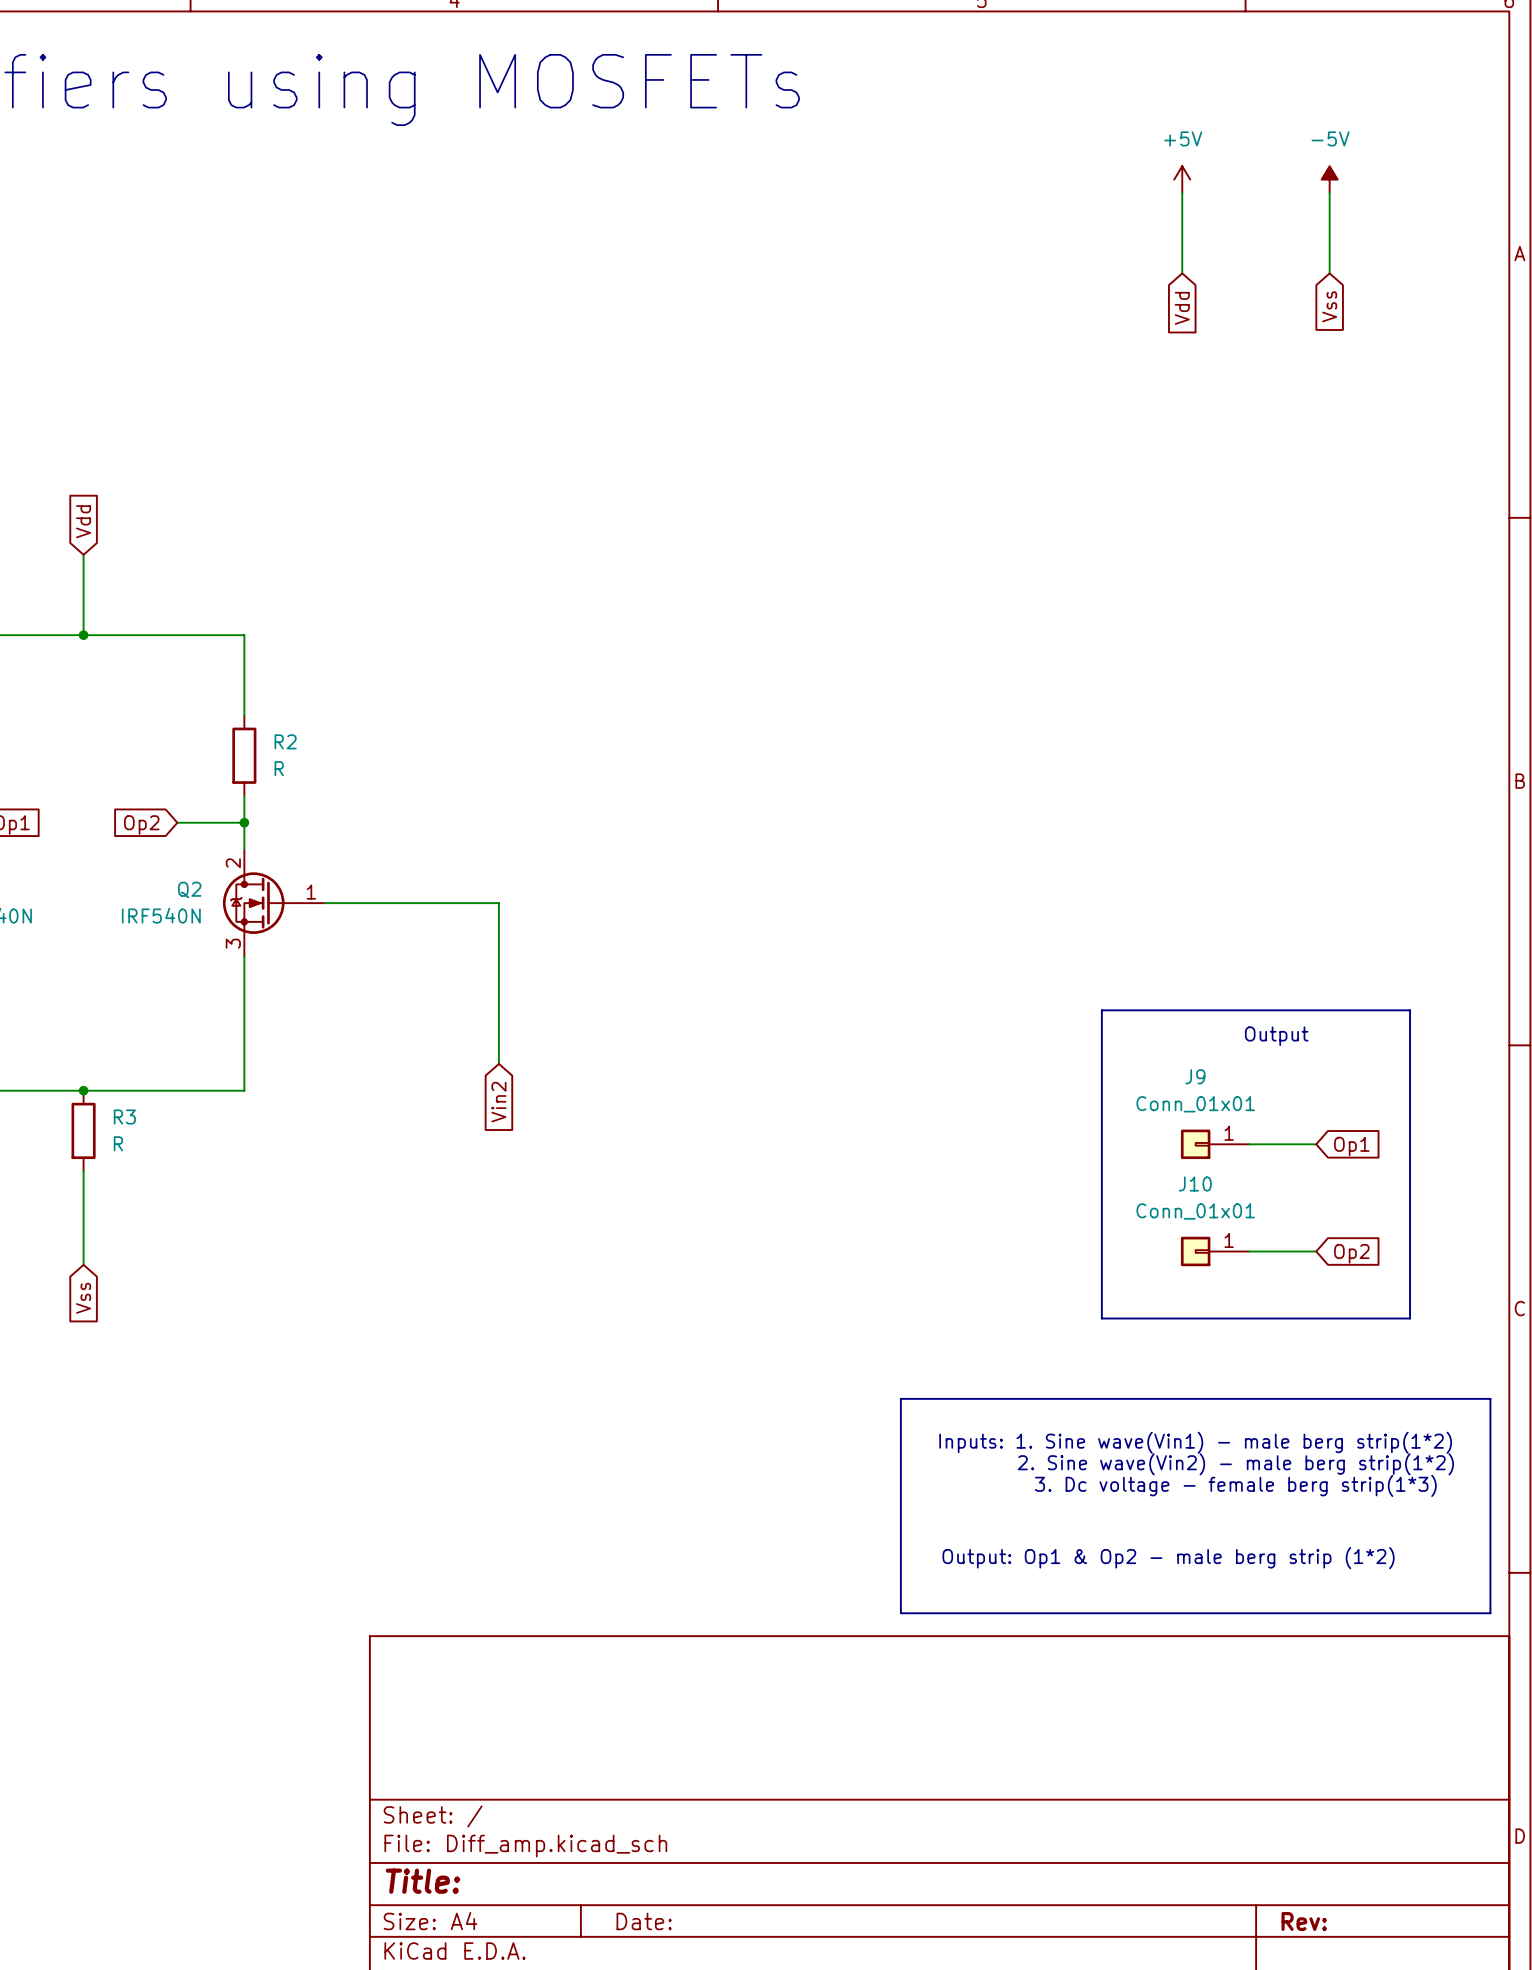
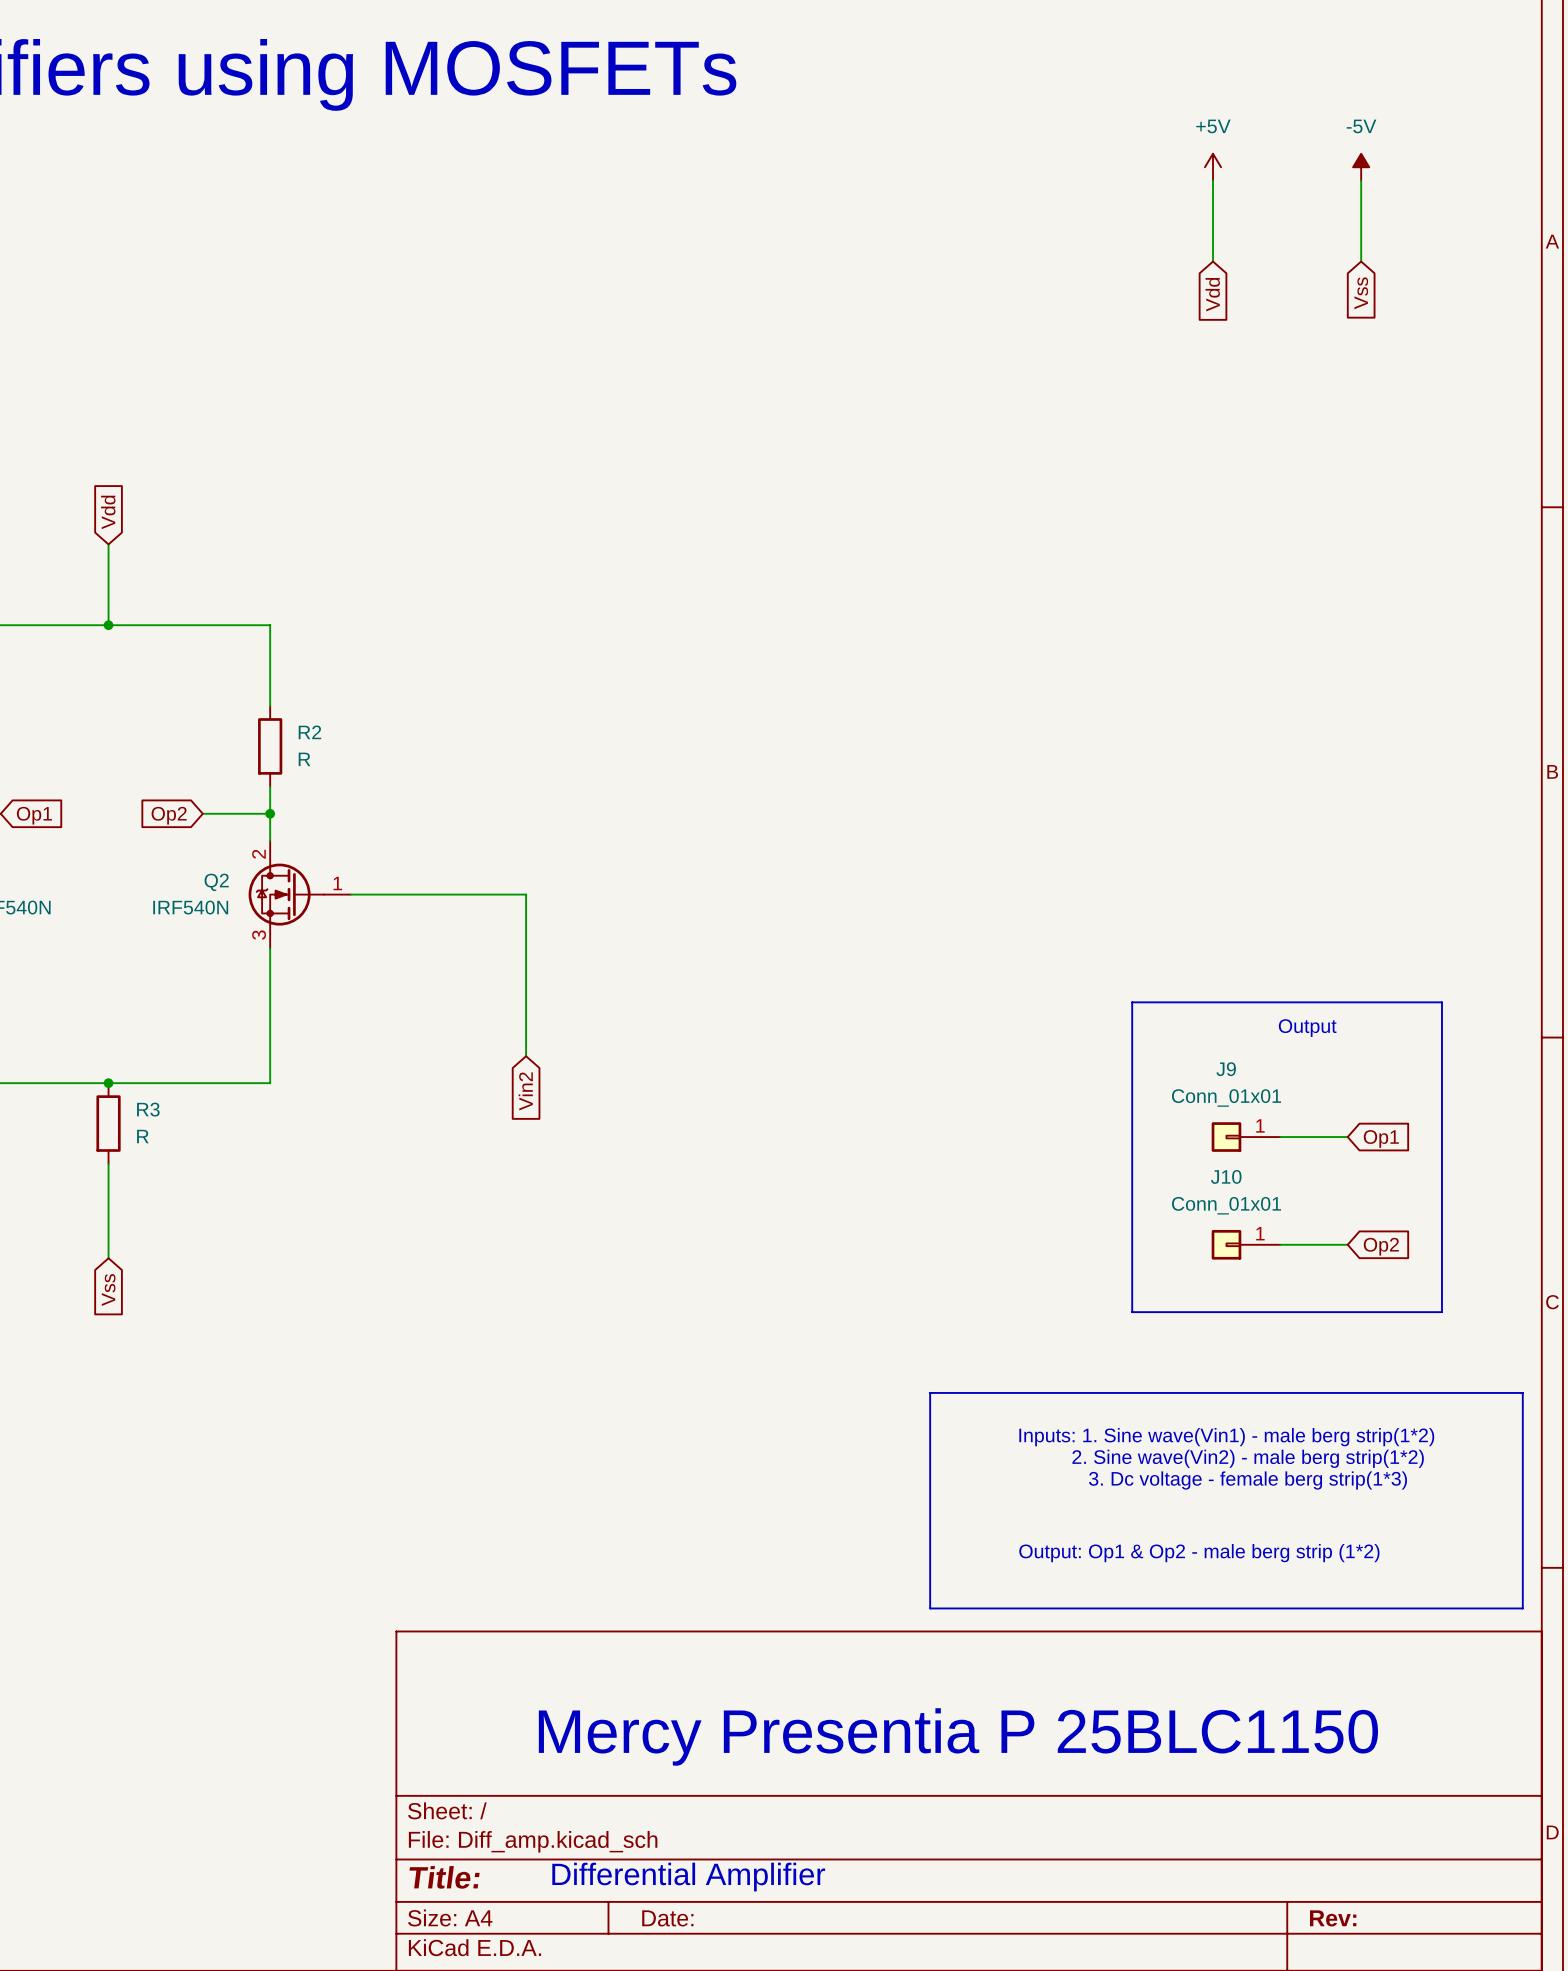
text: none -> Mercy Presentia P 25BLC1150 (958, 1736)
text: none -> Differential Amplifier (688, 1877)

